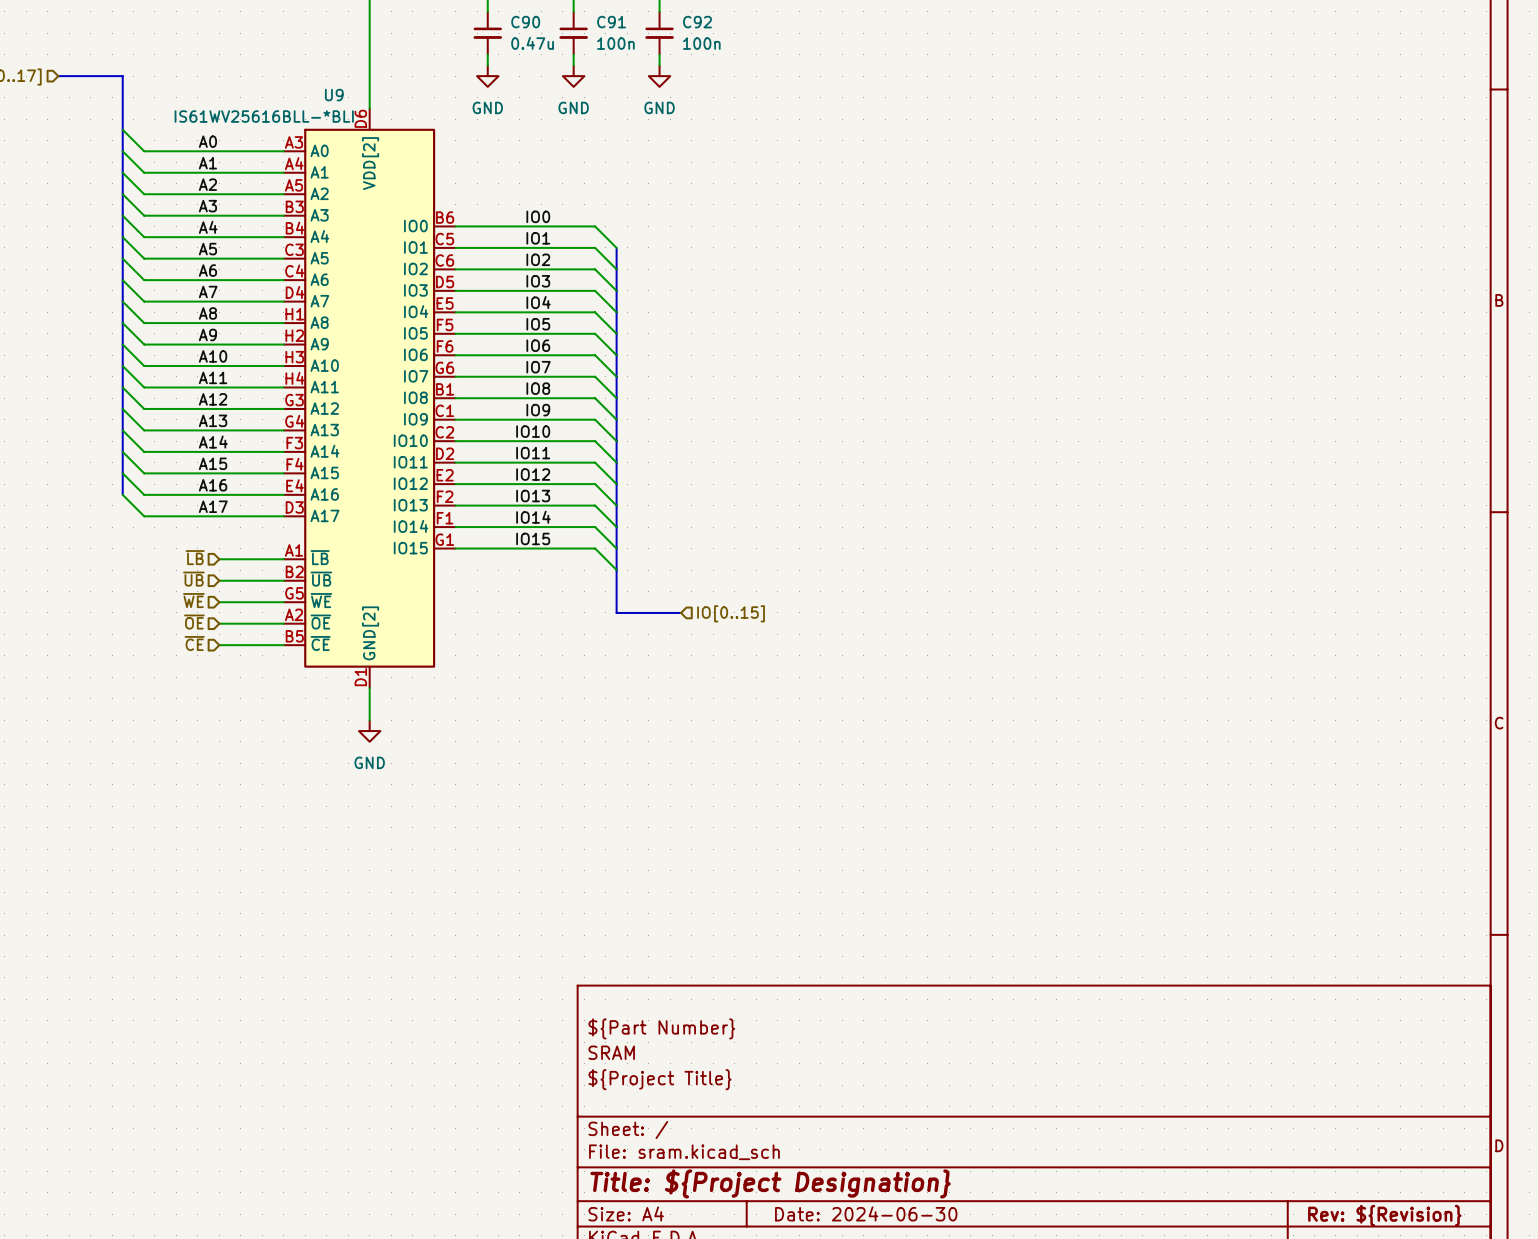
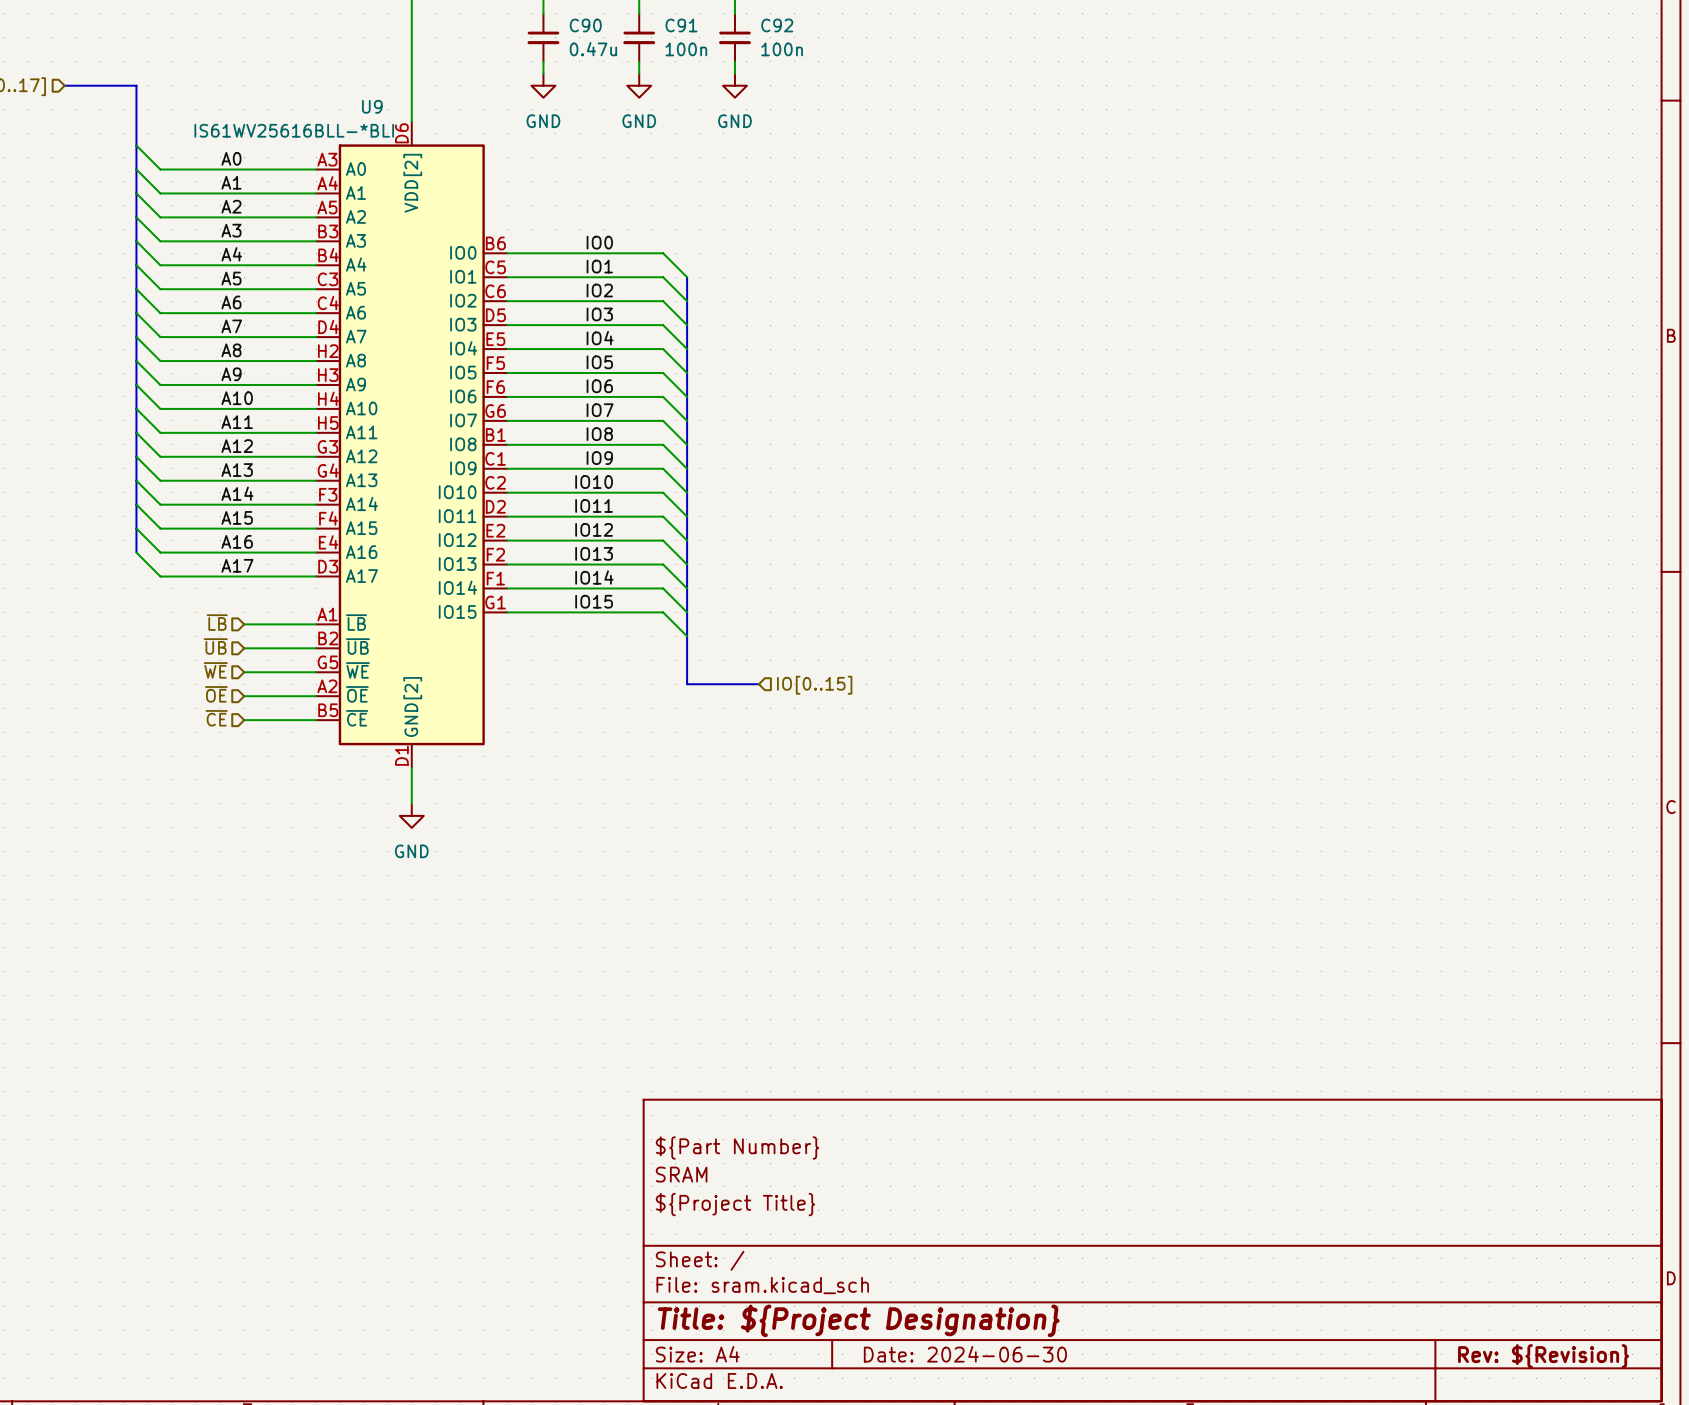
U9 pin number: H1 (294, 314) -> H2 (328, 351)
U9 pin number: H2 (294, 335) -> H3 (328, 375)
U9 pin number: H3 (294, 357) -> H4 (328, 398)
U9 pin number: H4 (295, 378) -> H5 (328, 422)

